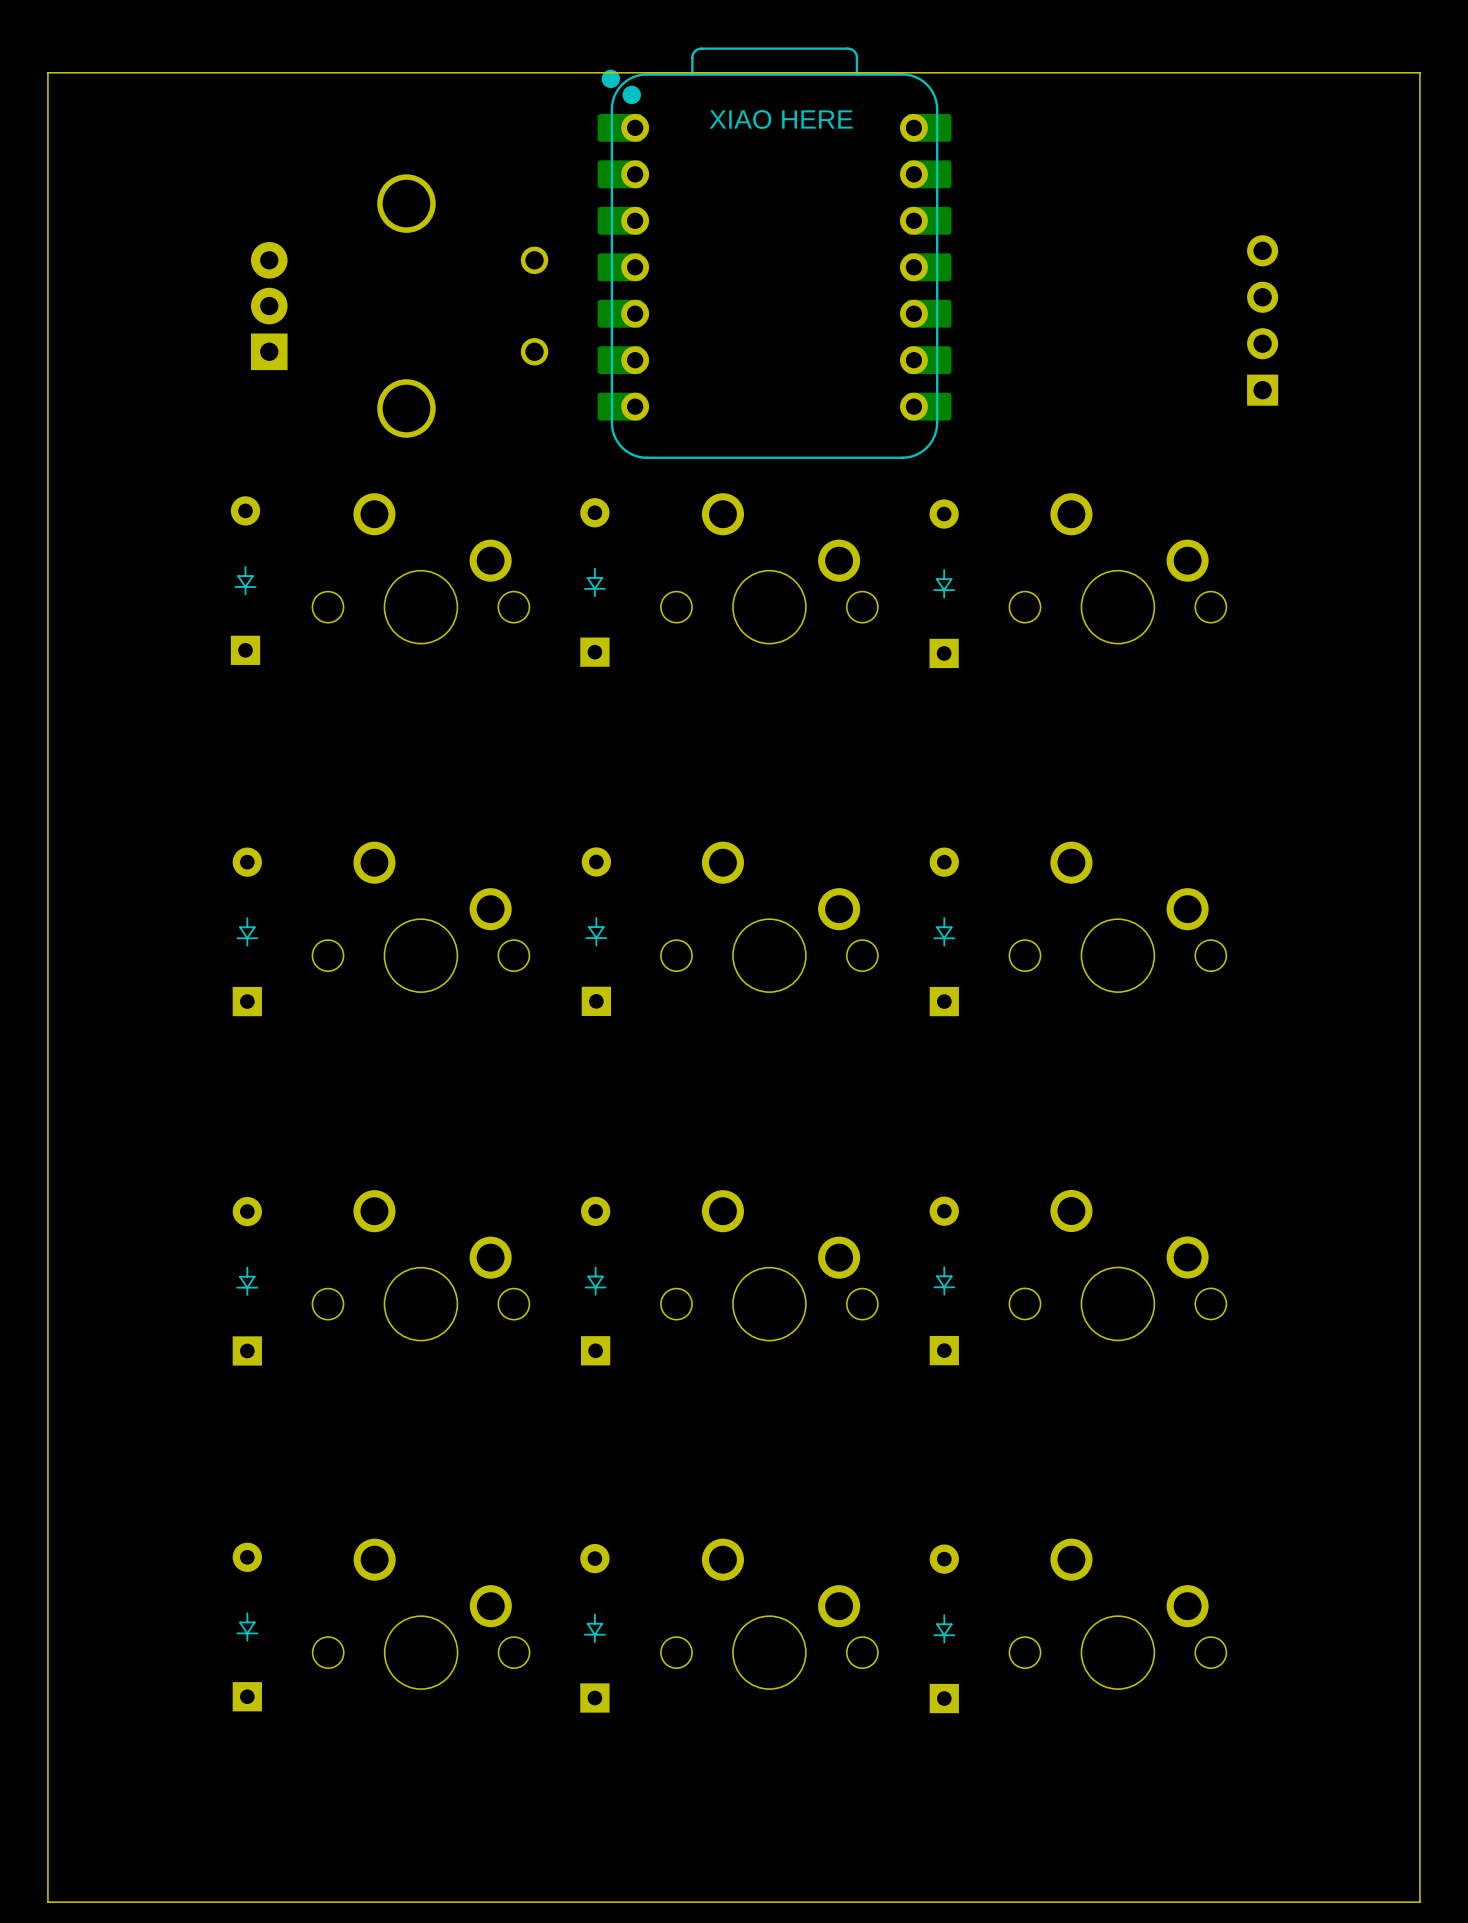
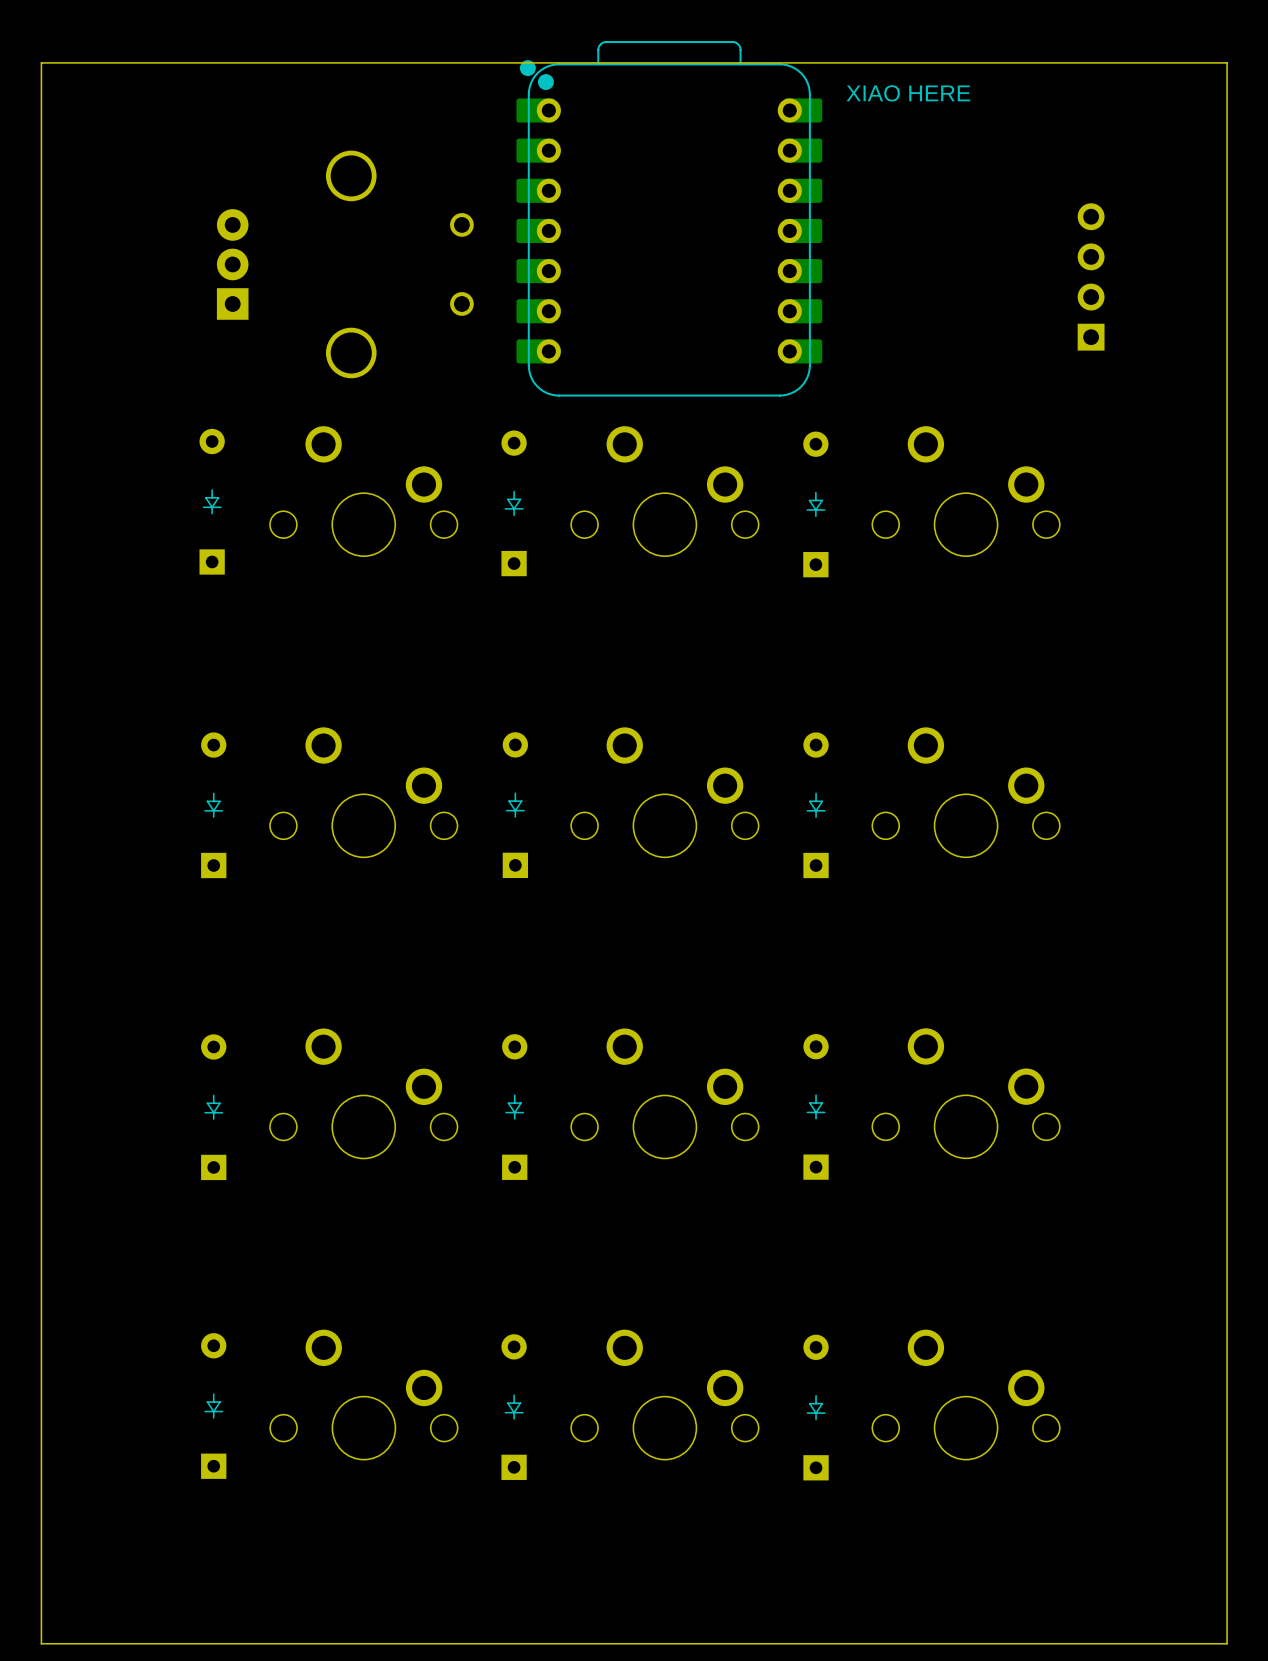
text position: XIAO HERE (781, 119) -> XIAO HERE (908, 93)

